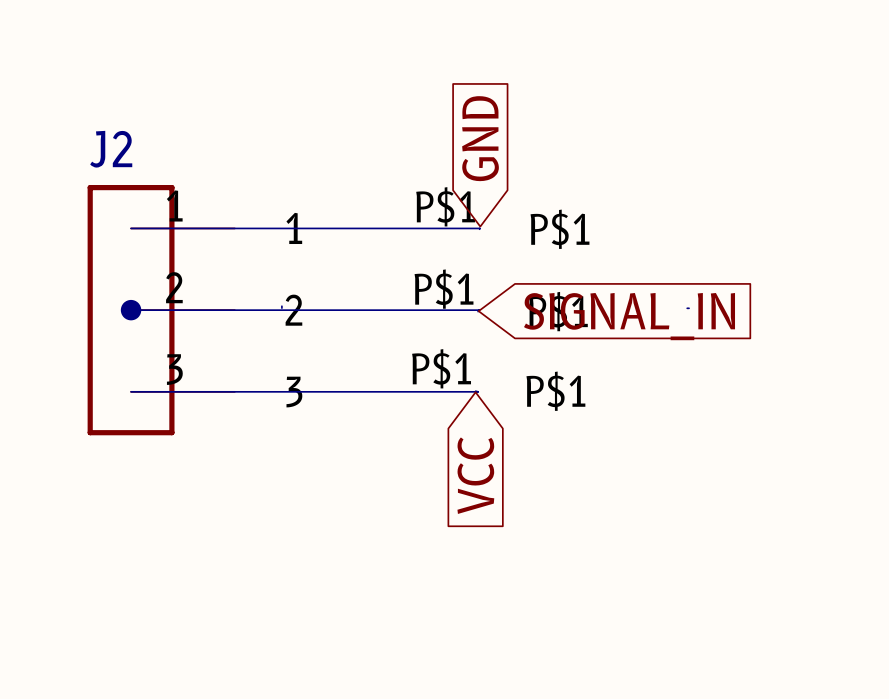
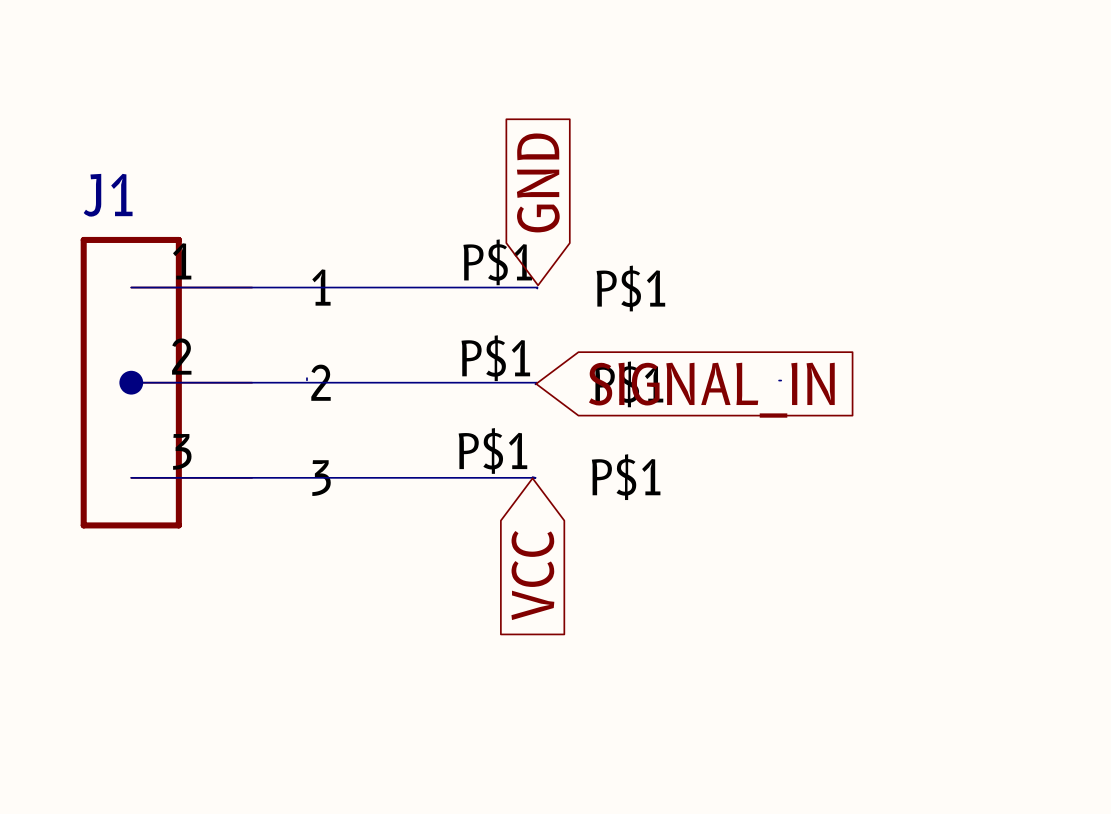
J2 name: J2 (111, 149) -> J1 (108, 195)

